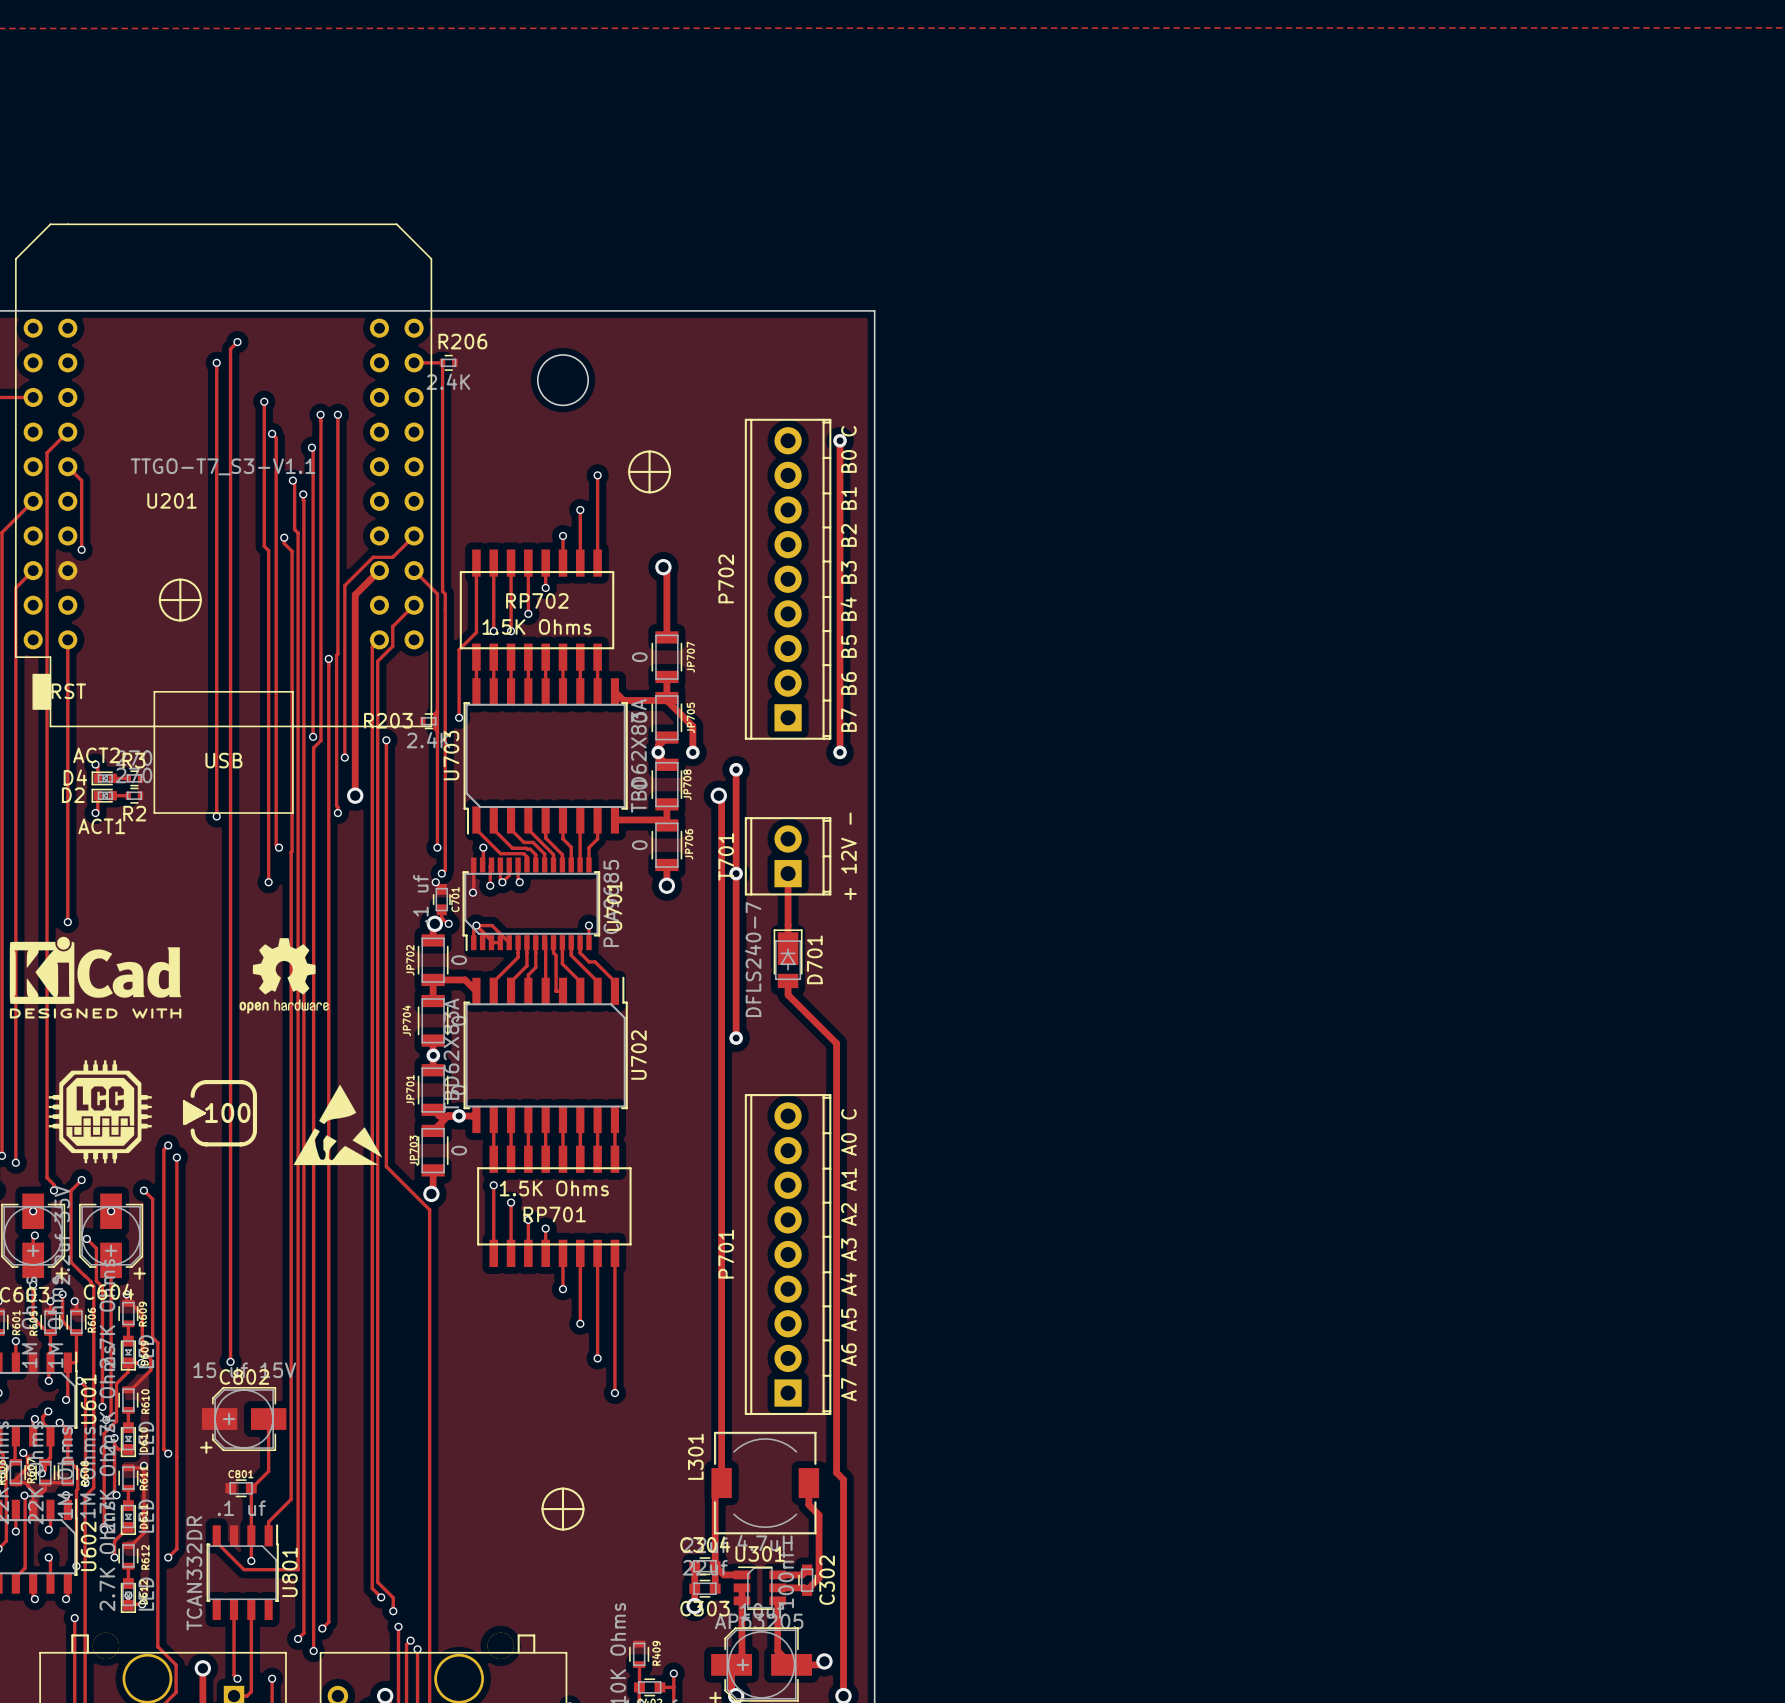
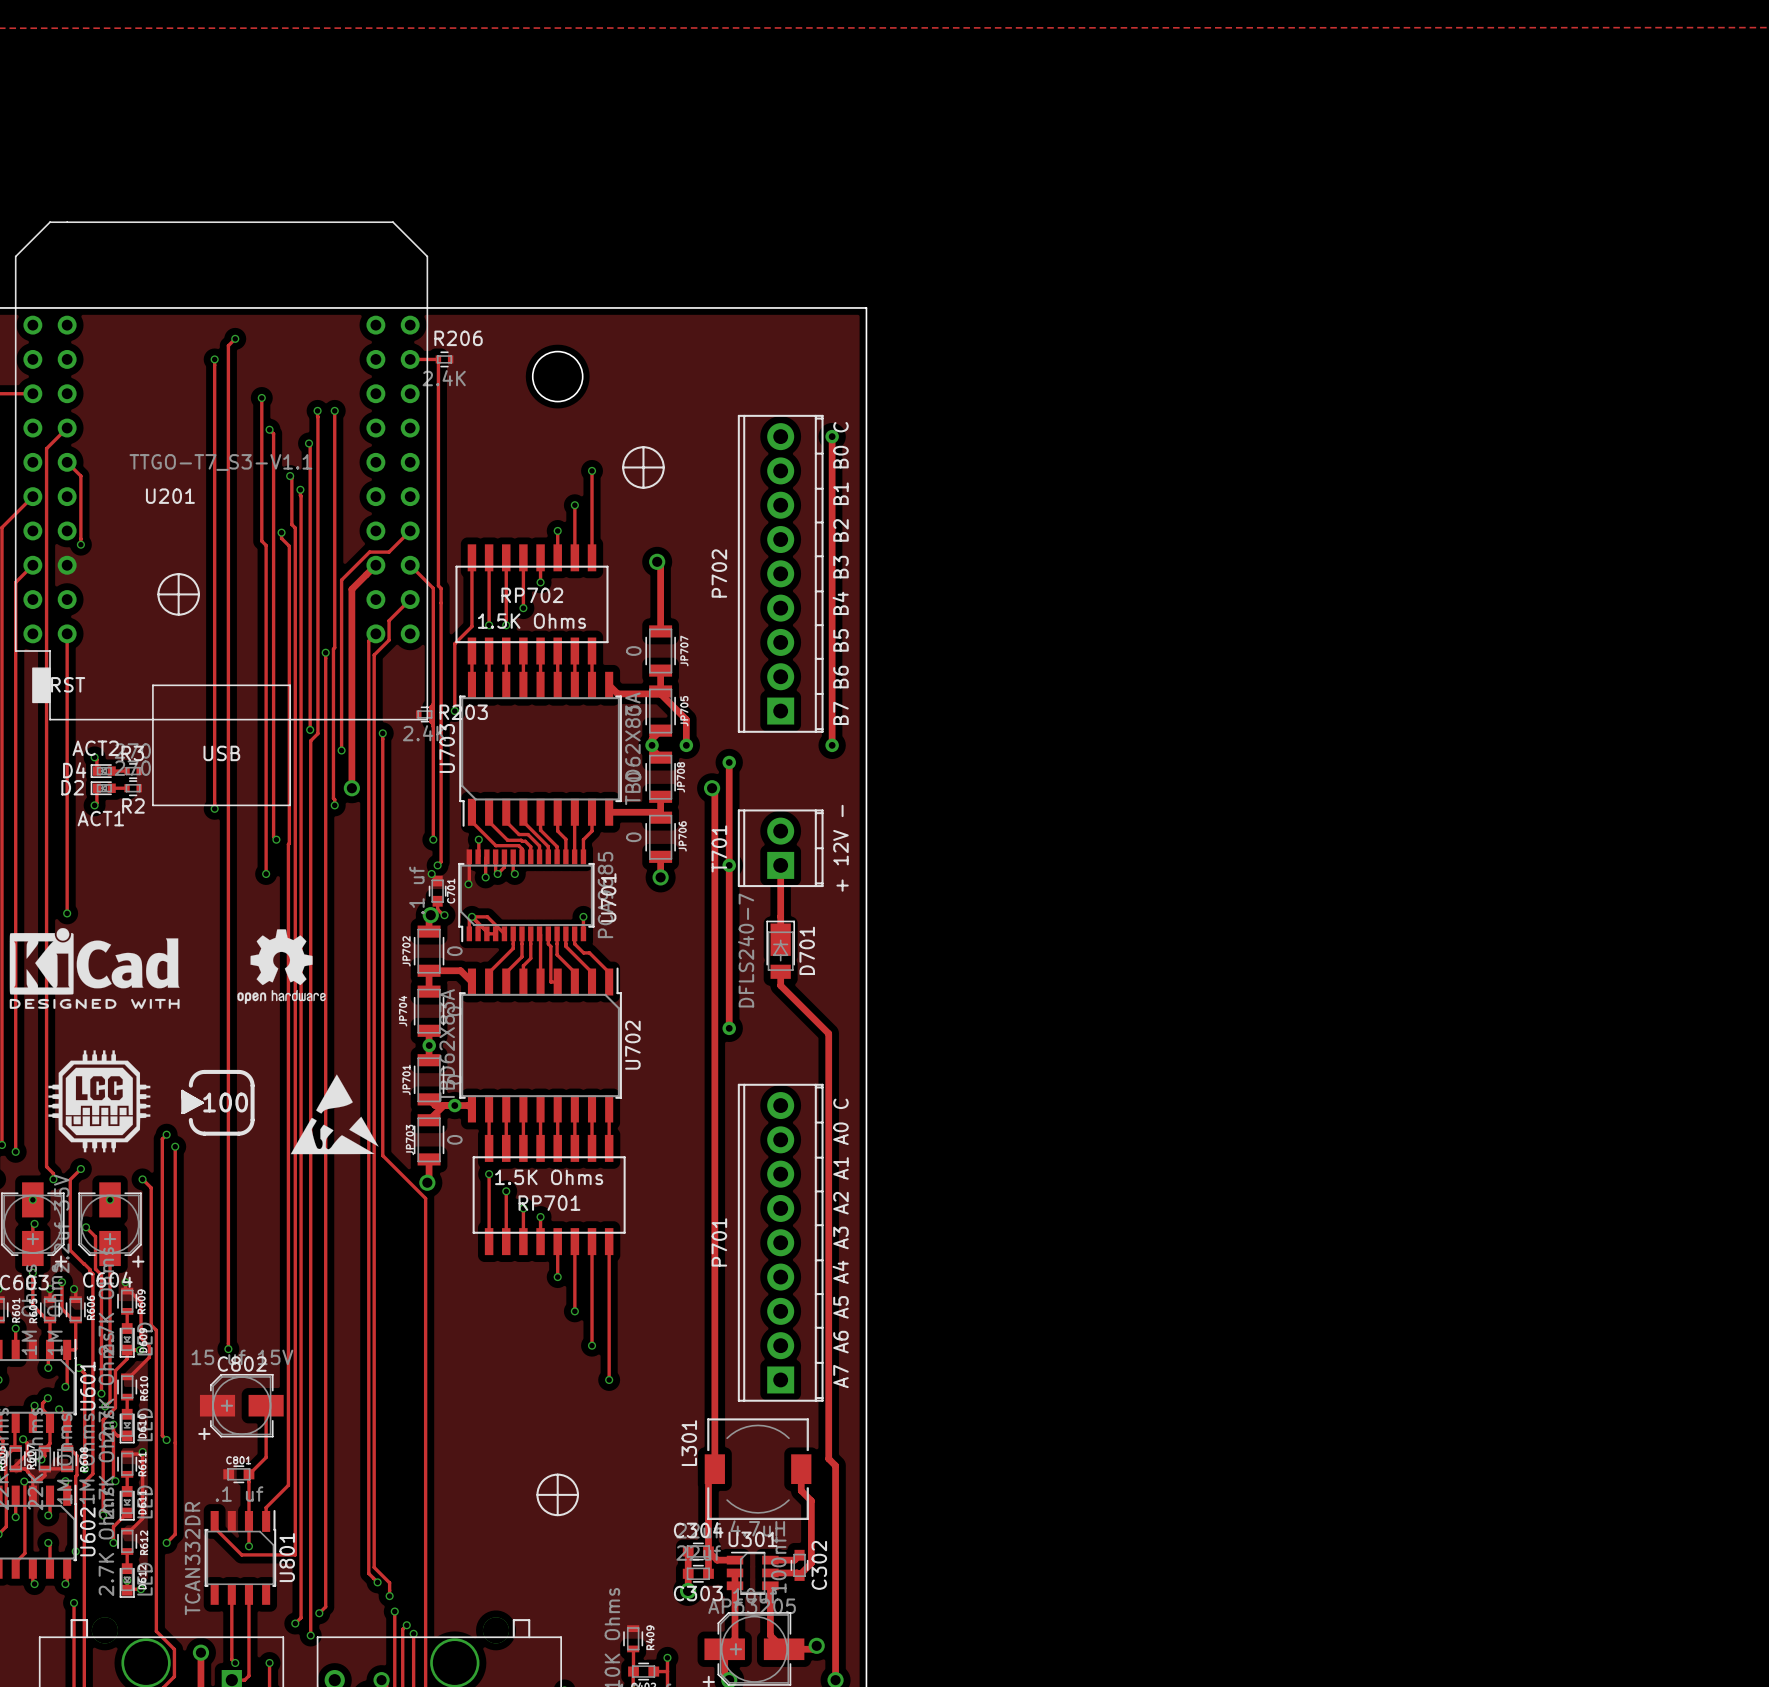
R203 name position: R203 (388, 720) -> R203 (463, 712)

